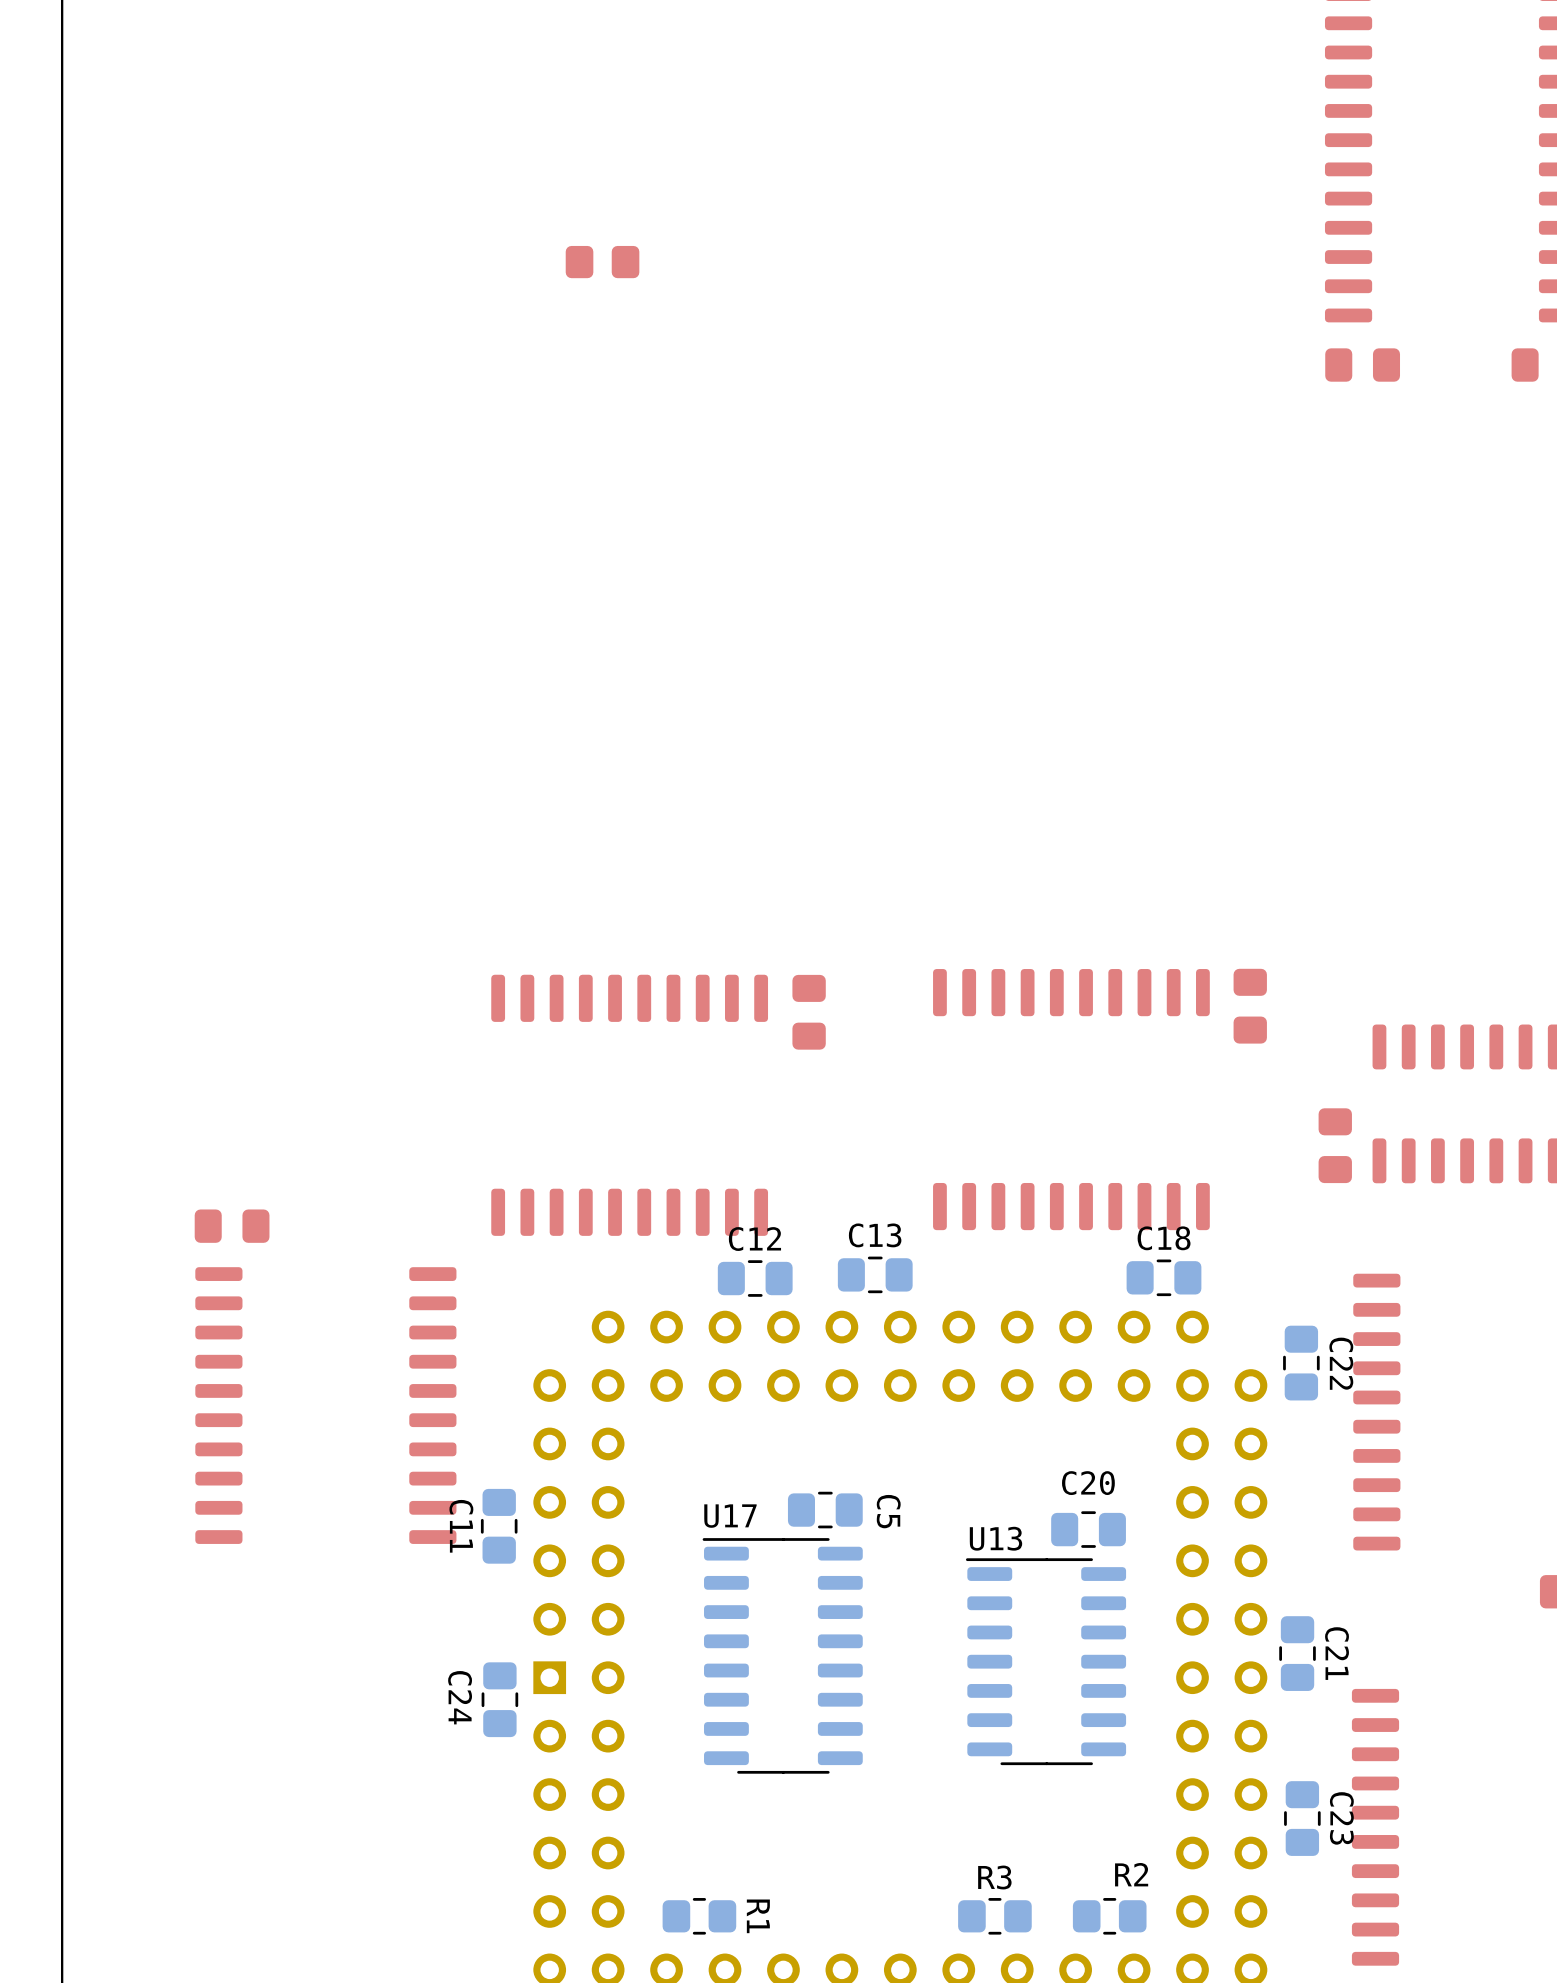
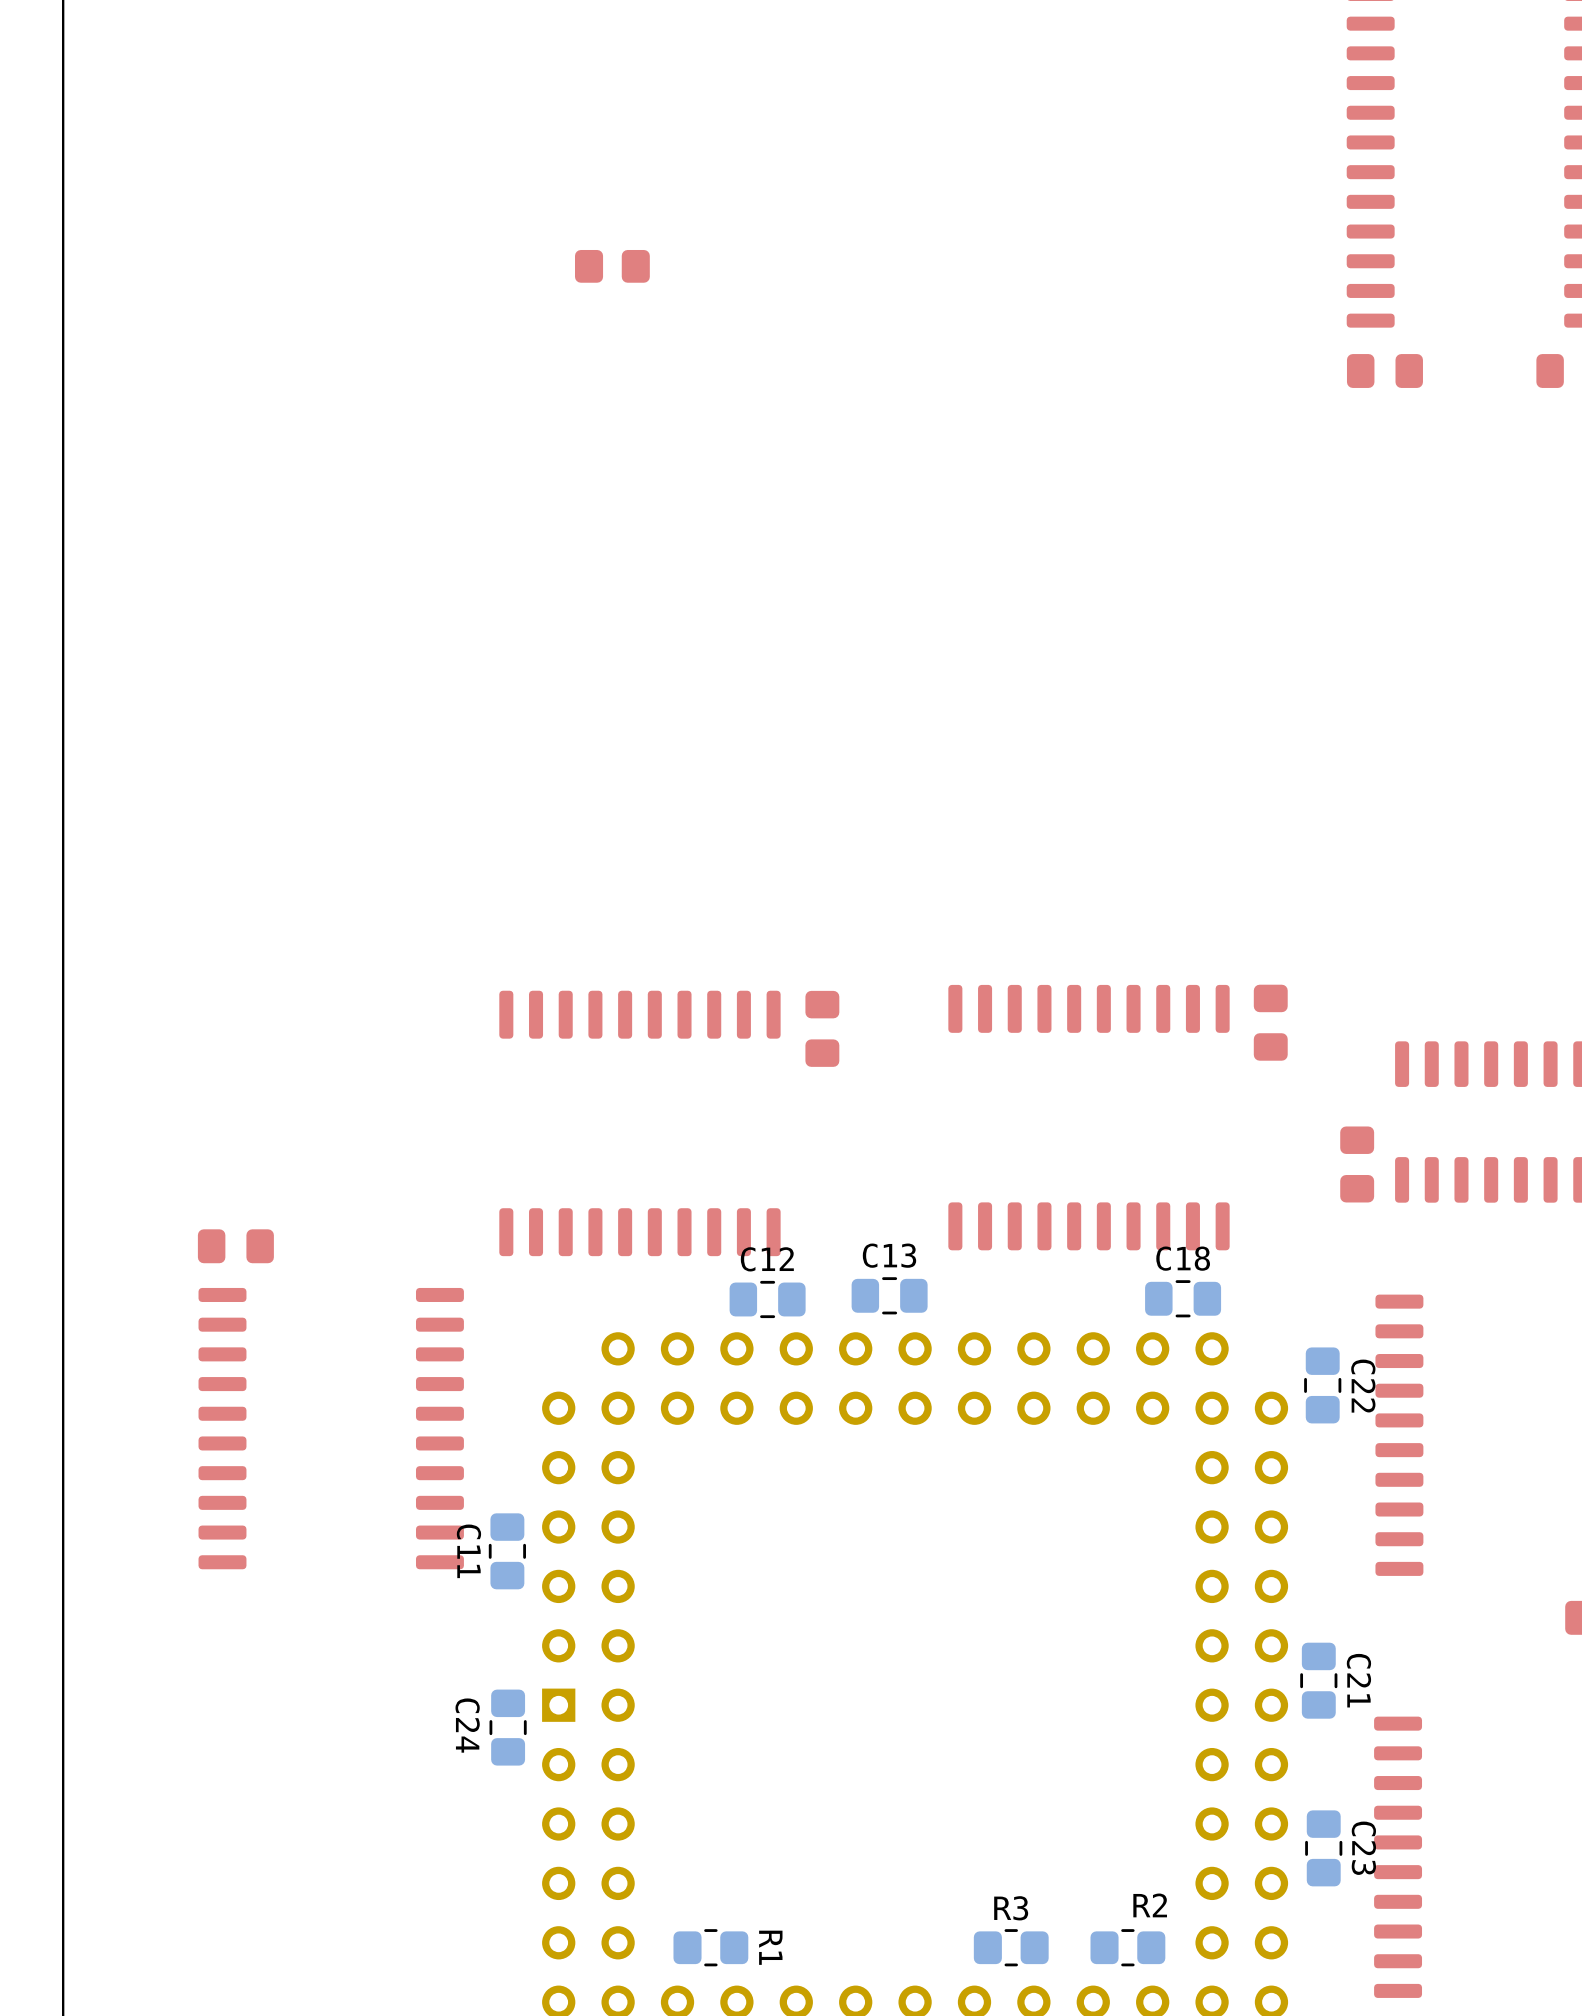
C5: (825, 1510) -> none
C20: (1088, 1529) -> none
U17: (782, 1655) -> none
U13: (1046, 1661) -> none

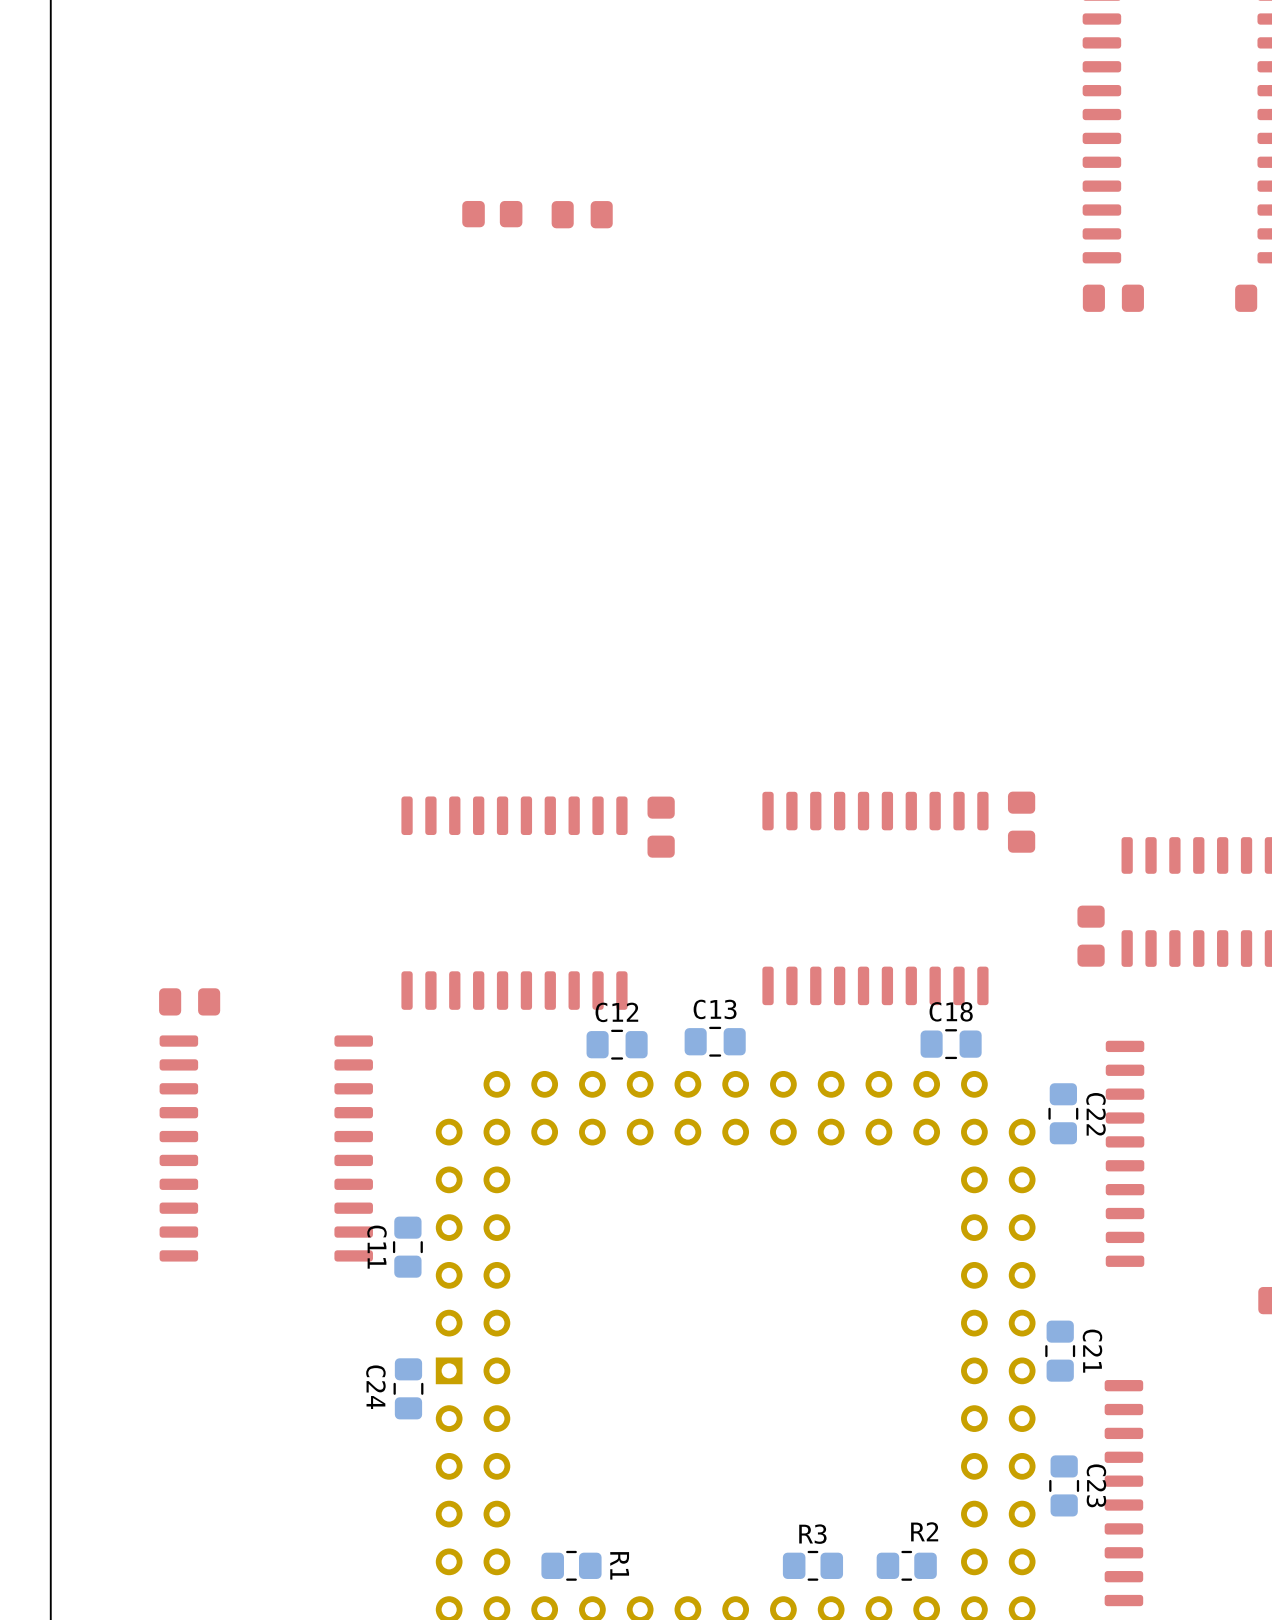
part: none -> (582, 214)

